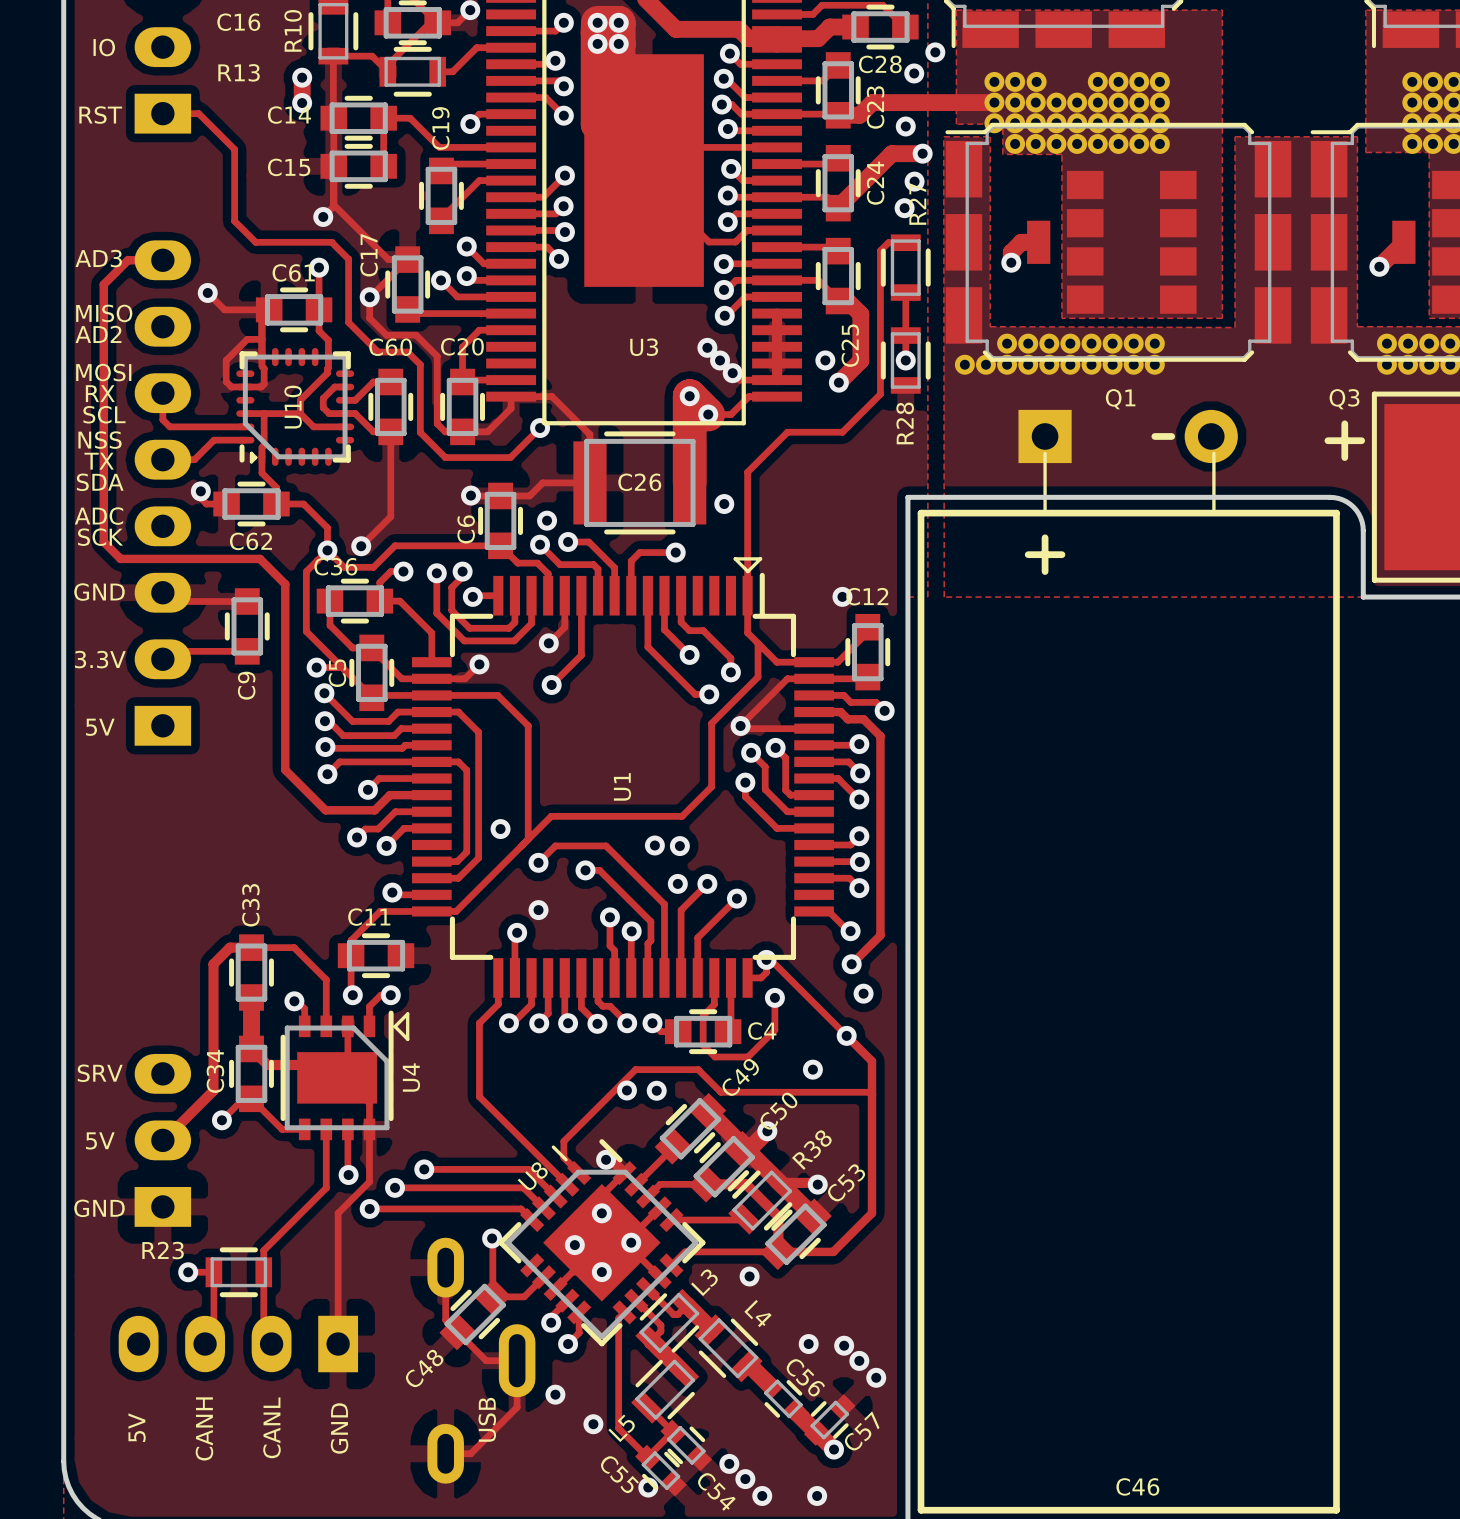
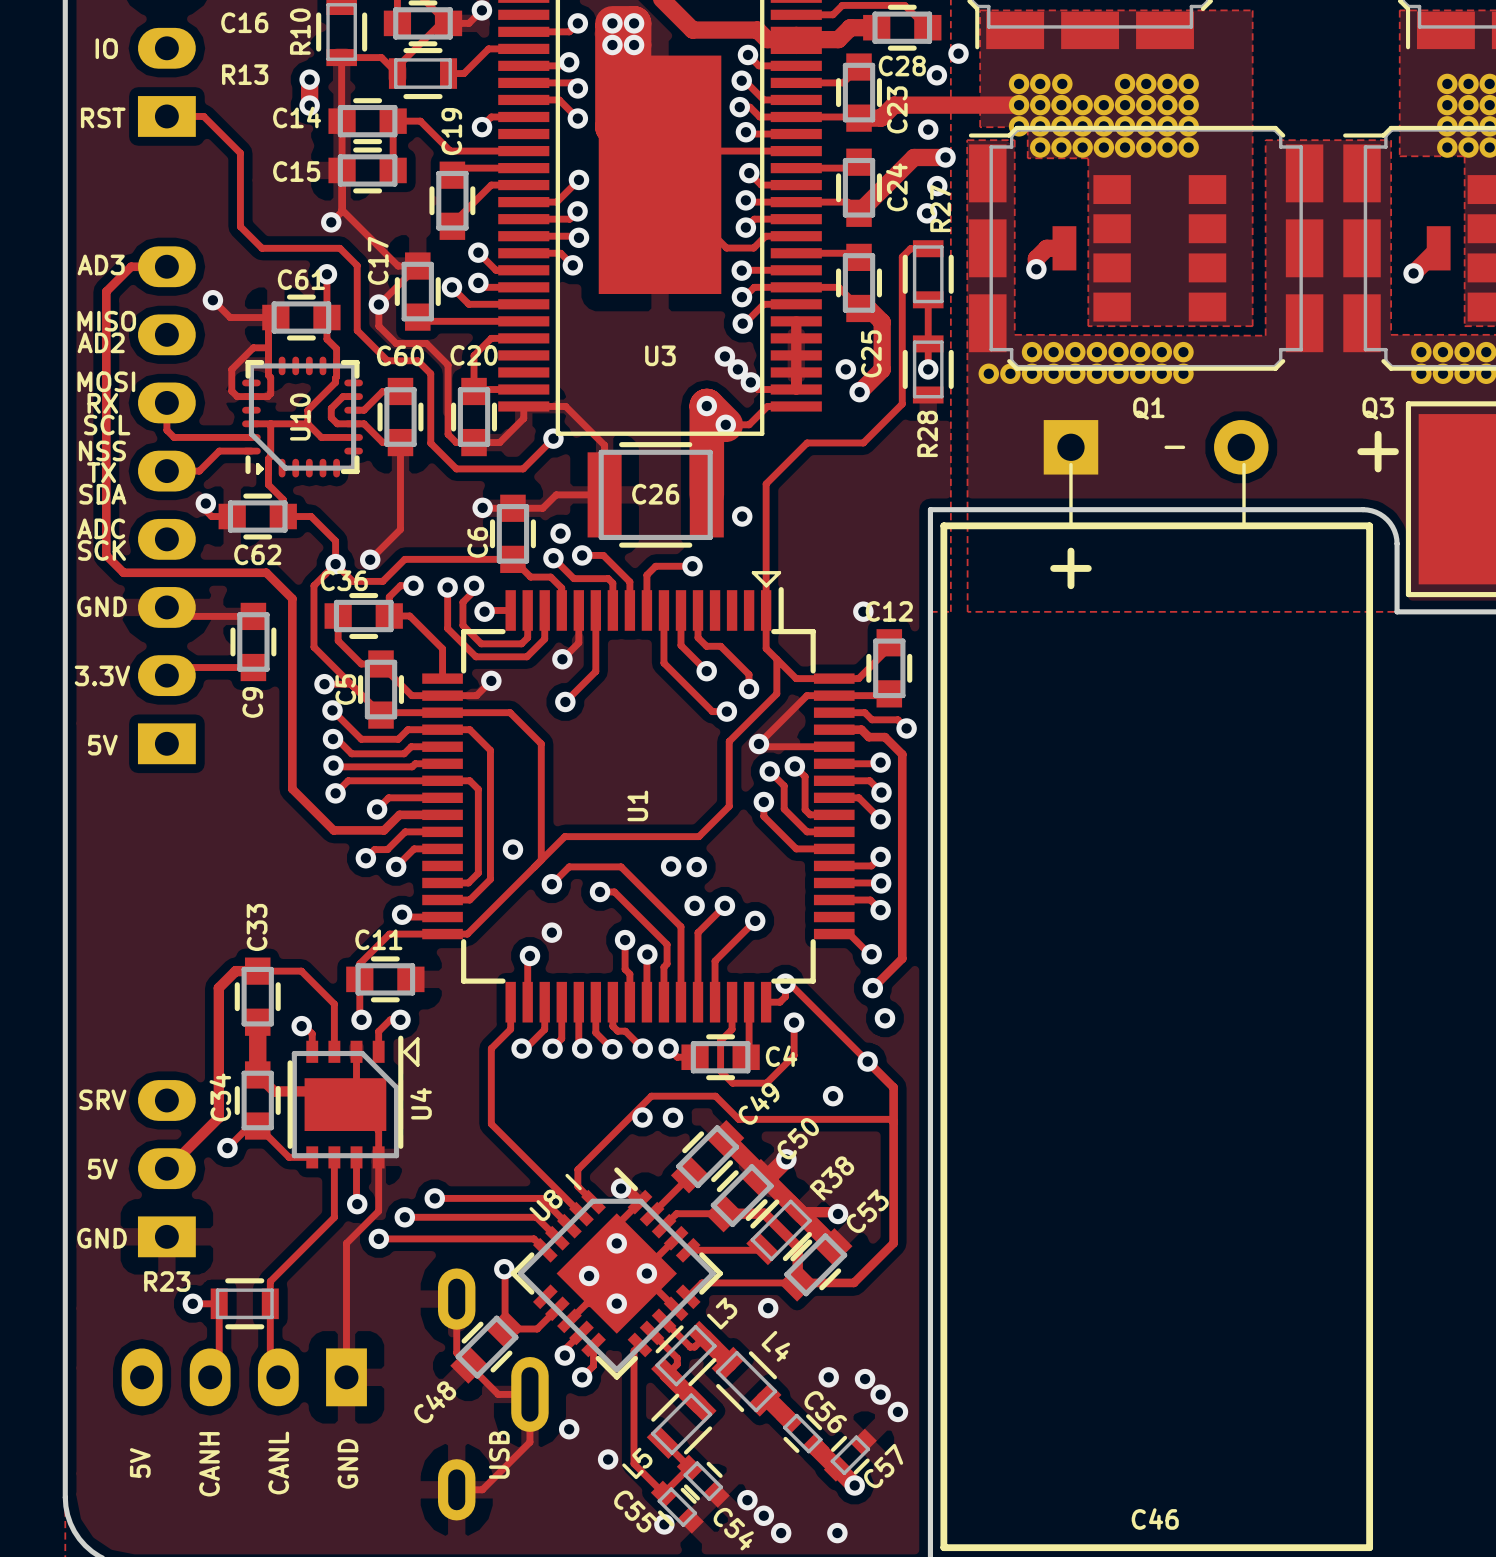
C46 footprint: [1018, 409, 1238, 464] -> [1043, 420, 1269, 475]
line: (1154, 436) (1171, 436) -> none

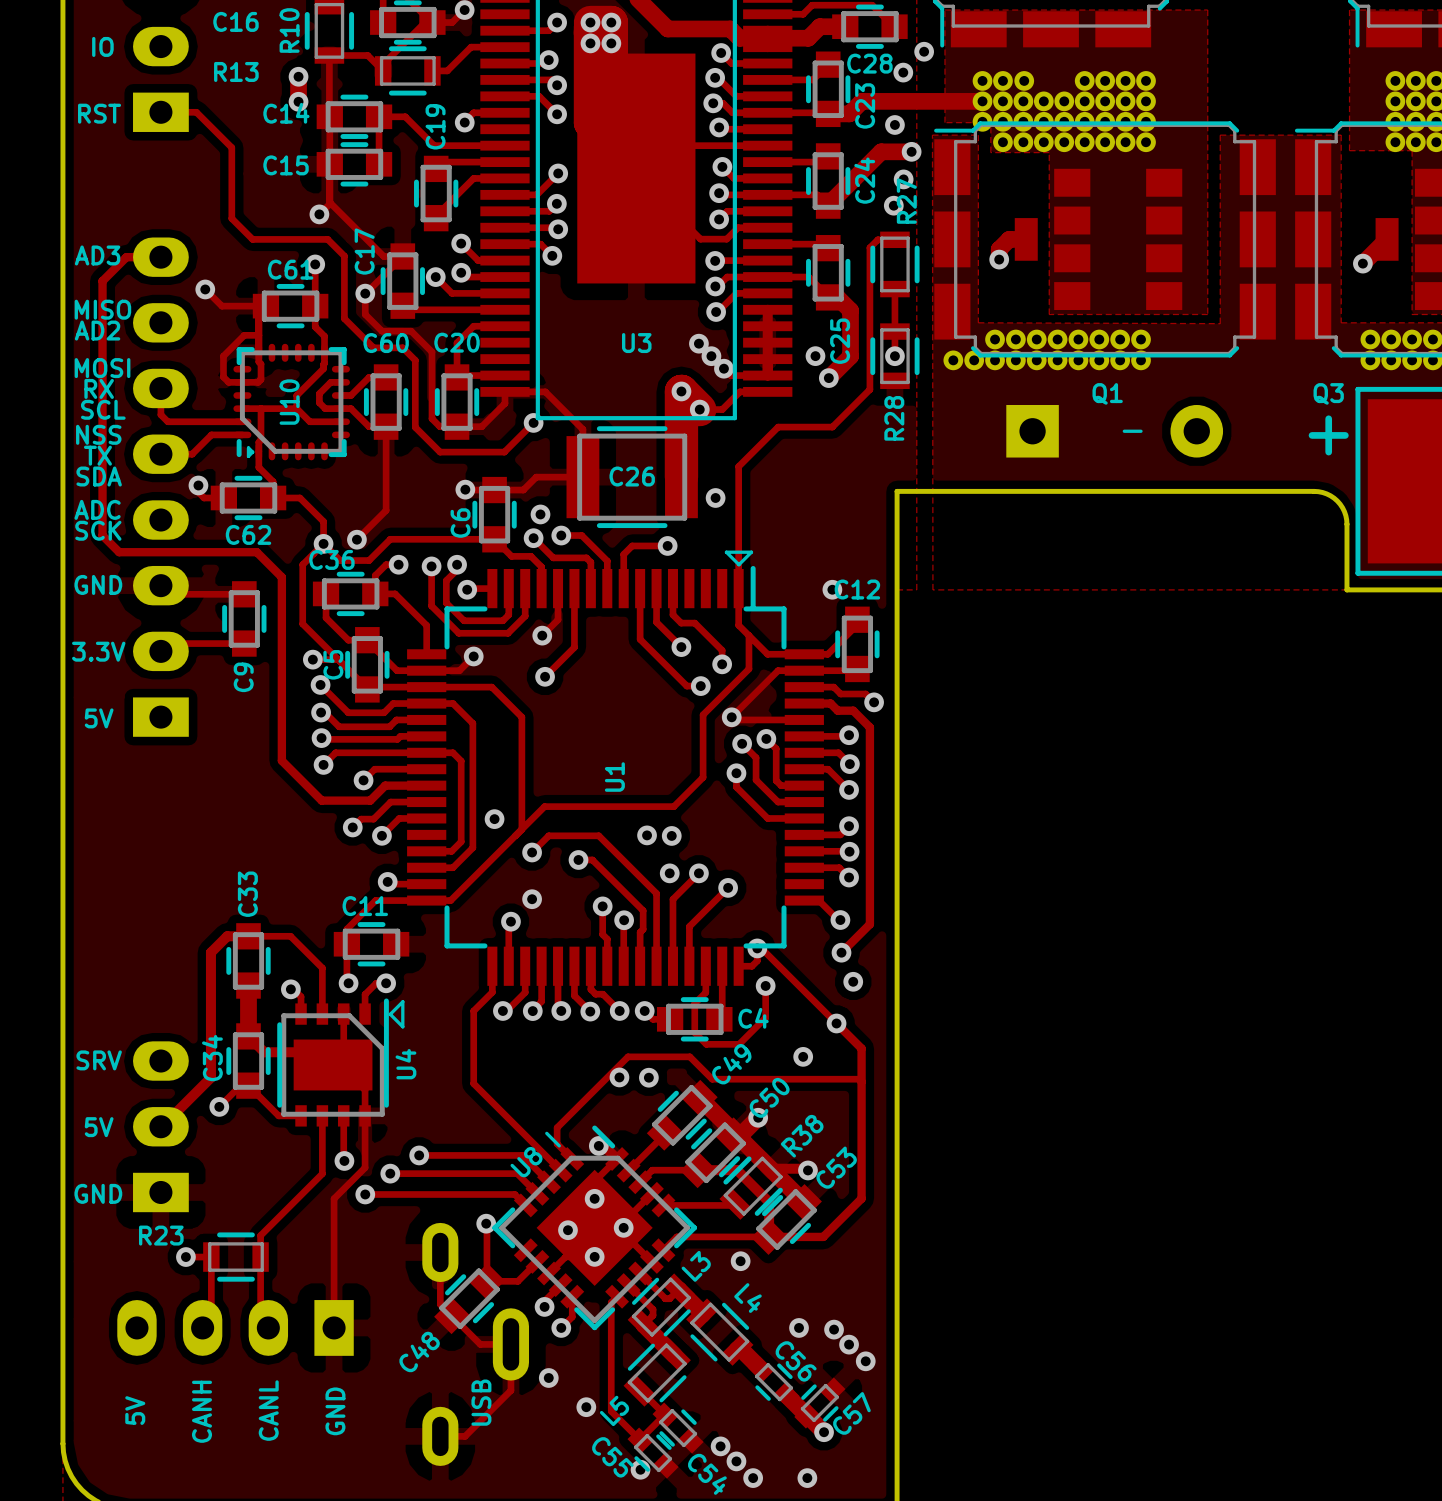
line: (1070, 464) (1070, 525) -> none
line: (1244, 464) (1244, 525) -> none
line: (943, 525) (1369, 525) (1369, 1547) (943, 1547) (943, 525) -> none
line: (1070, 551) (1070, 585) -> none
line: (1053, 568) (1088, 568) -> none
C46 name: C46 (1155, 1519) -> none

